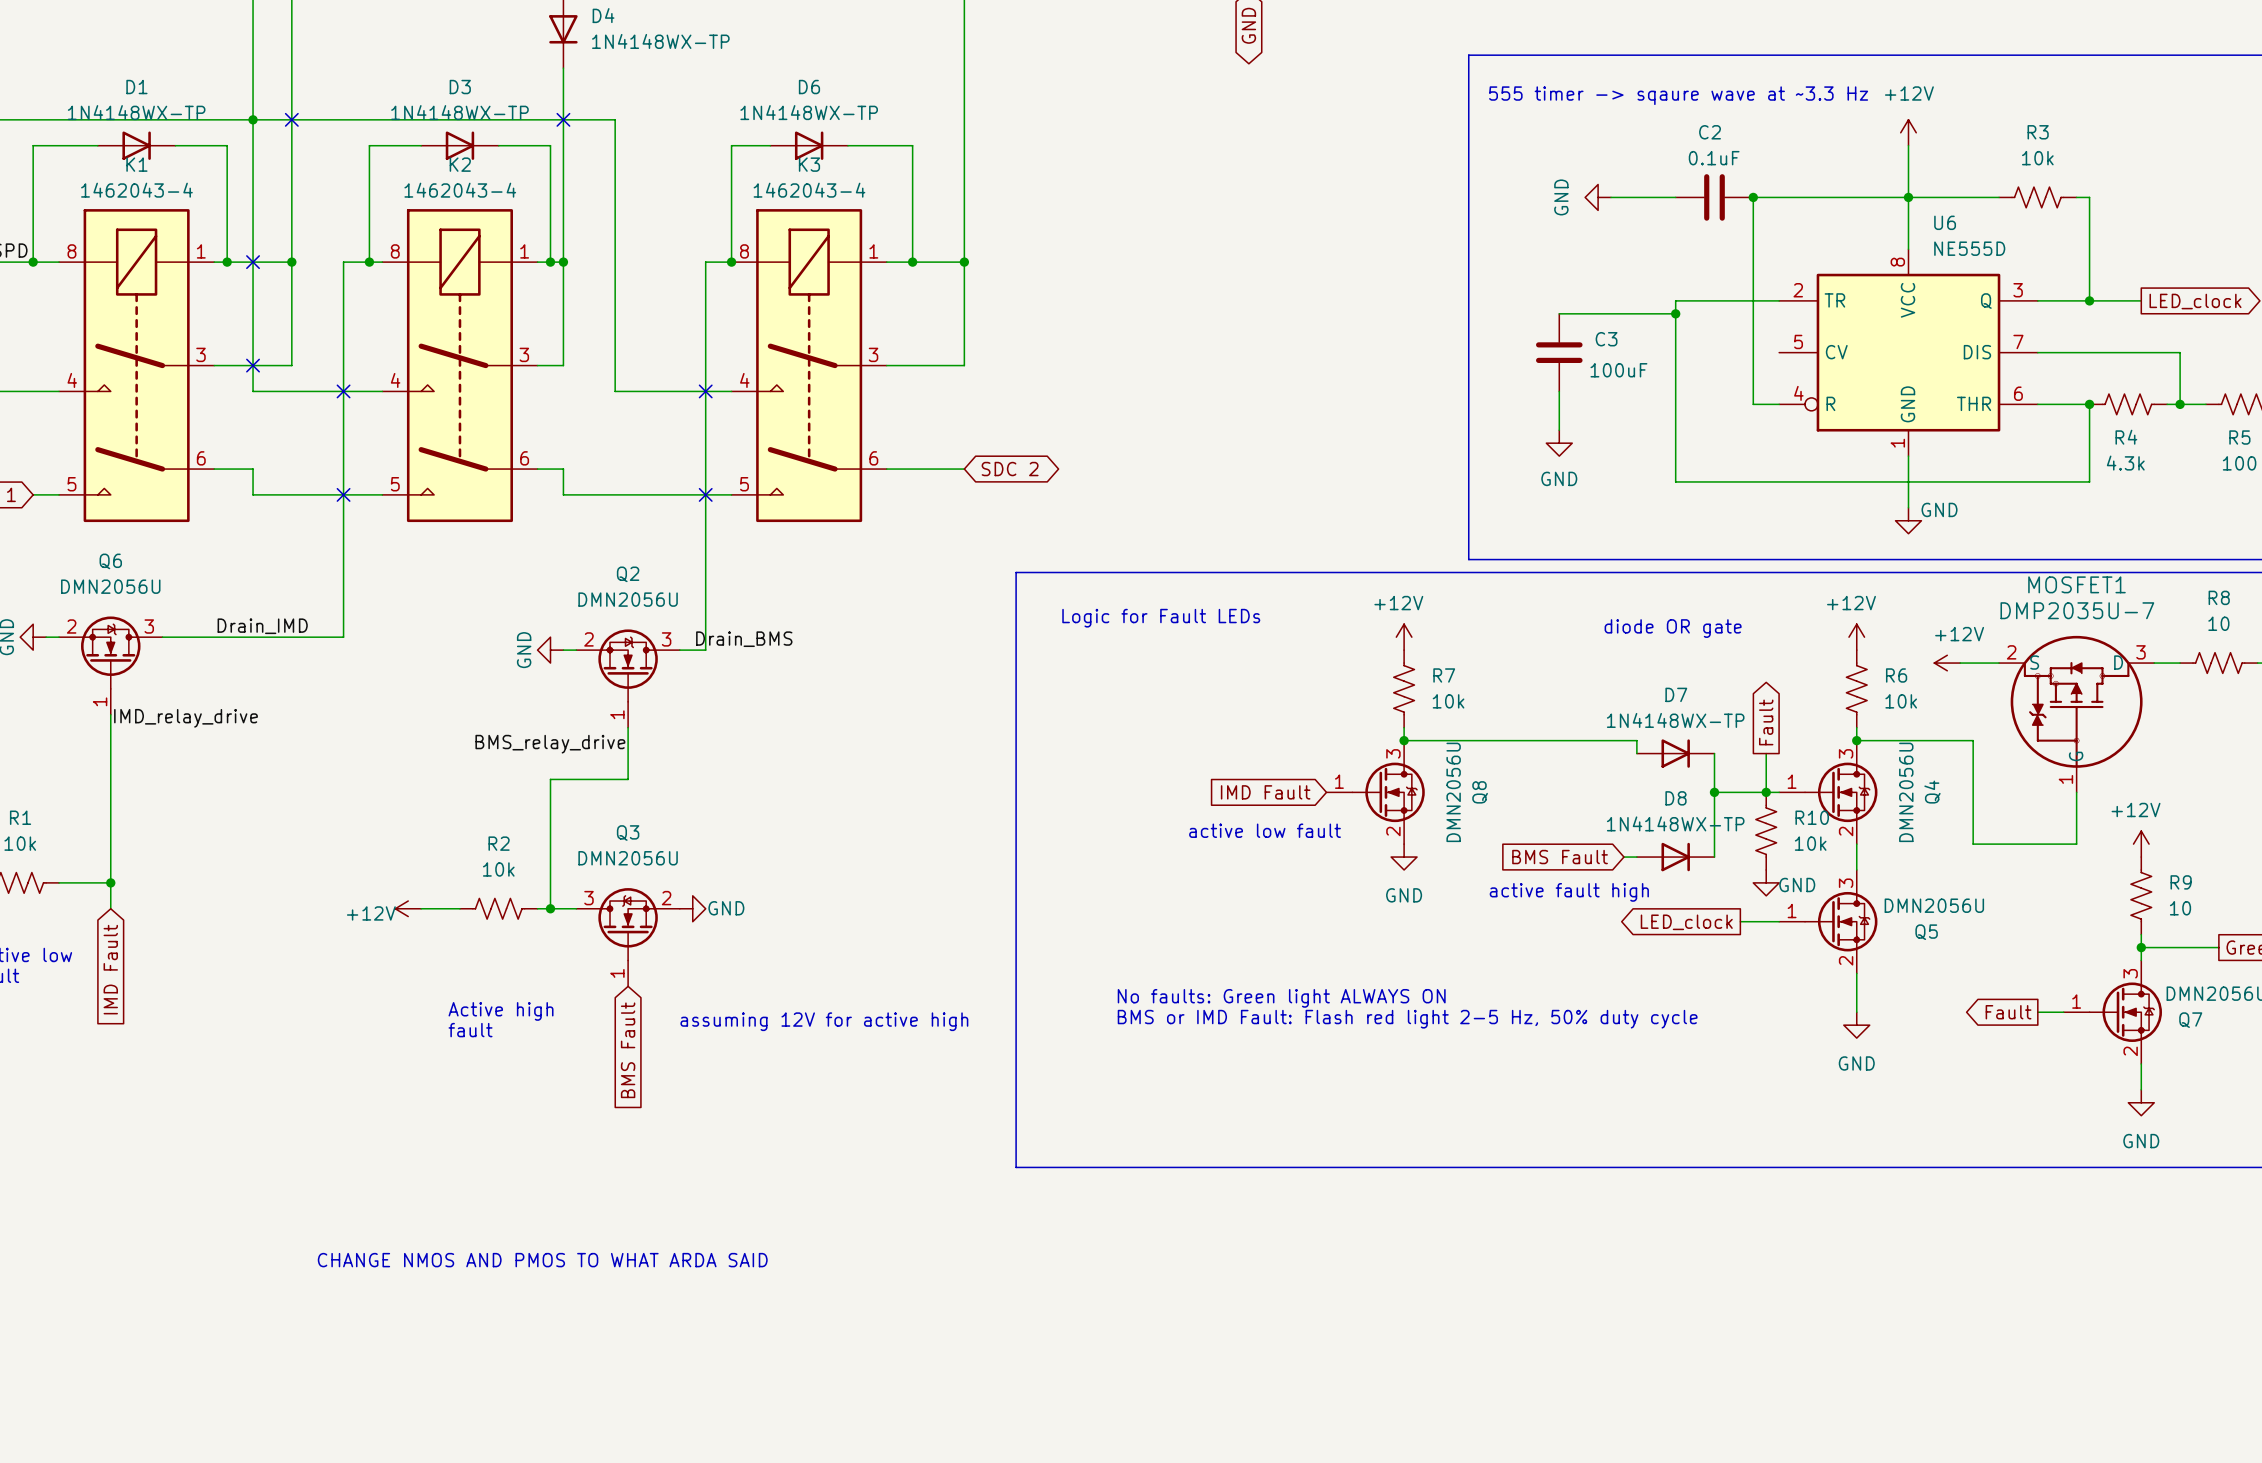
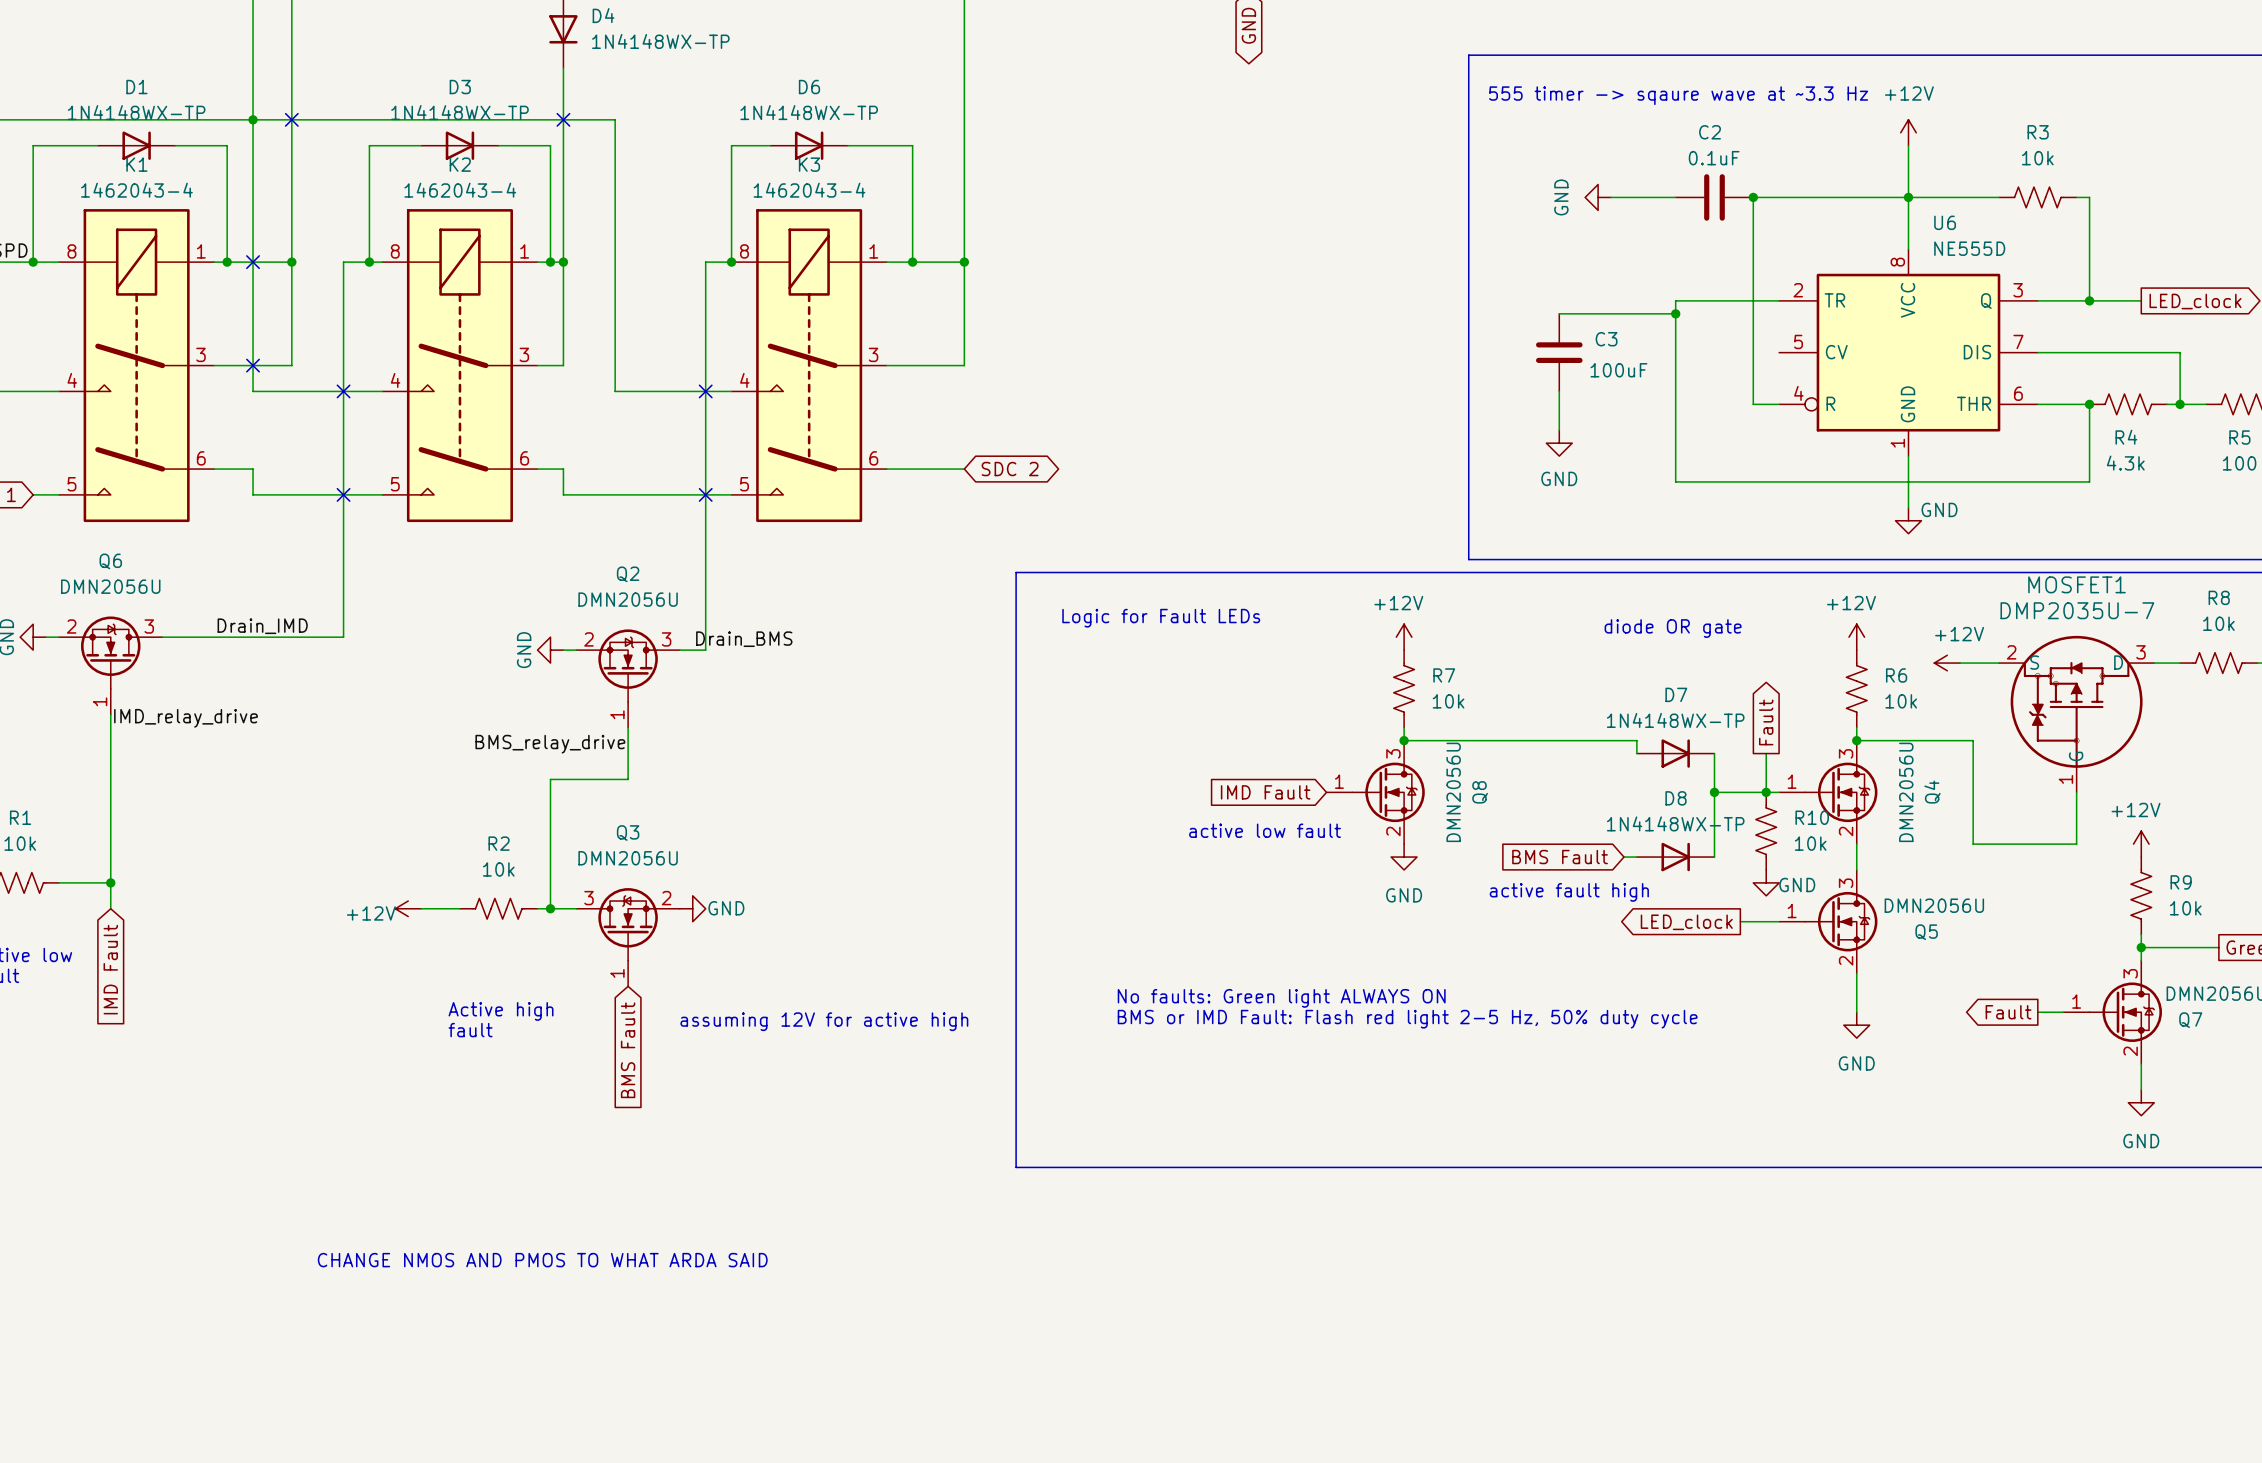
R8 value: 10 (2218, 623) -> 10k (2218, 623)
R9 value: 10 (2180, 908) -> 10k (2185, 908)

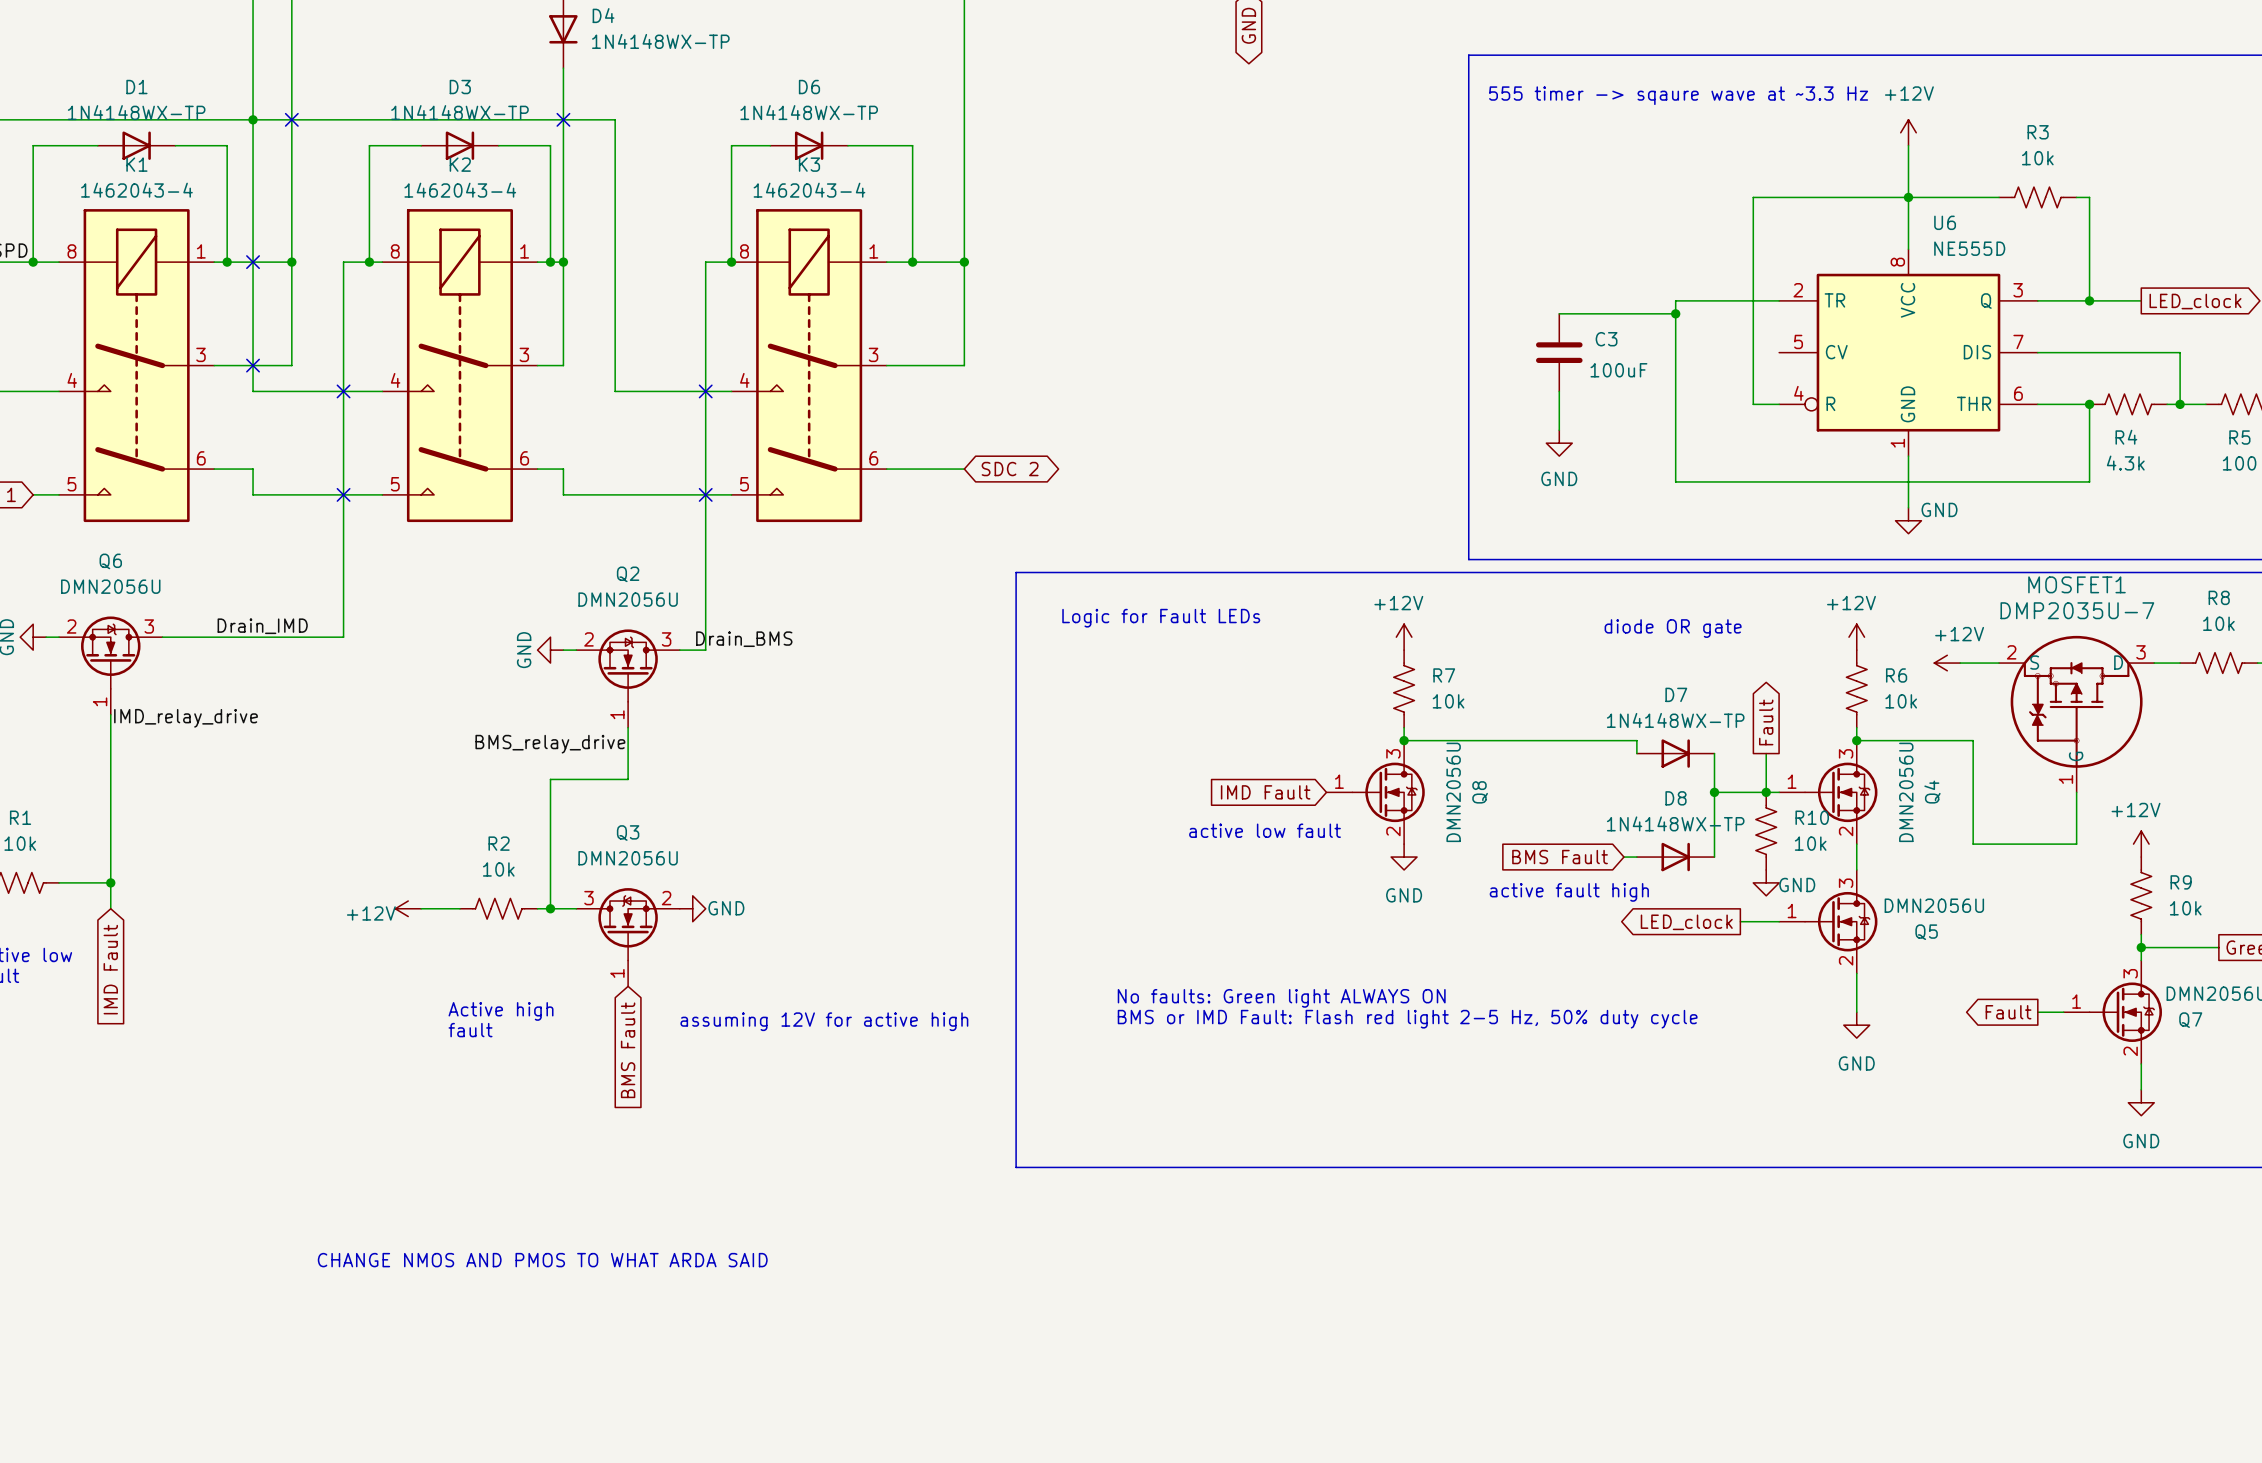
power symbol: GND (1598, 197) -> none
wire: (1611, 197) (1675, 197) -> none
C2: 0.1uF (1714, 197) -> none
junction: (1753, 197) -> none

